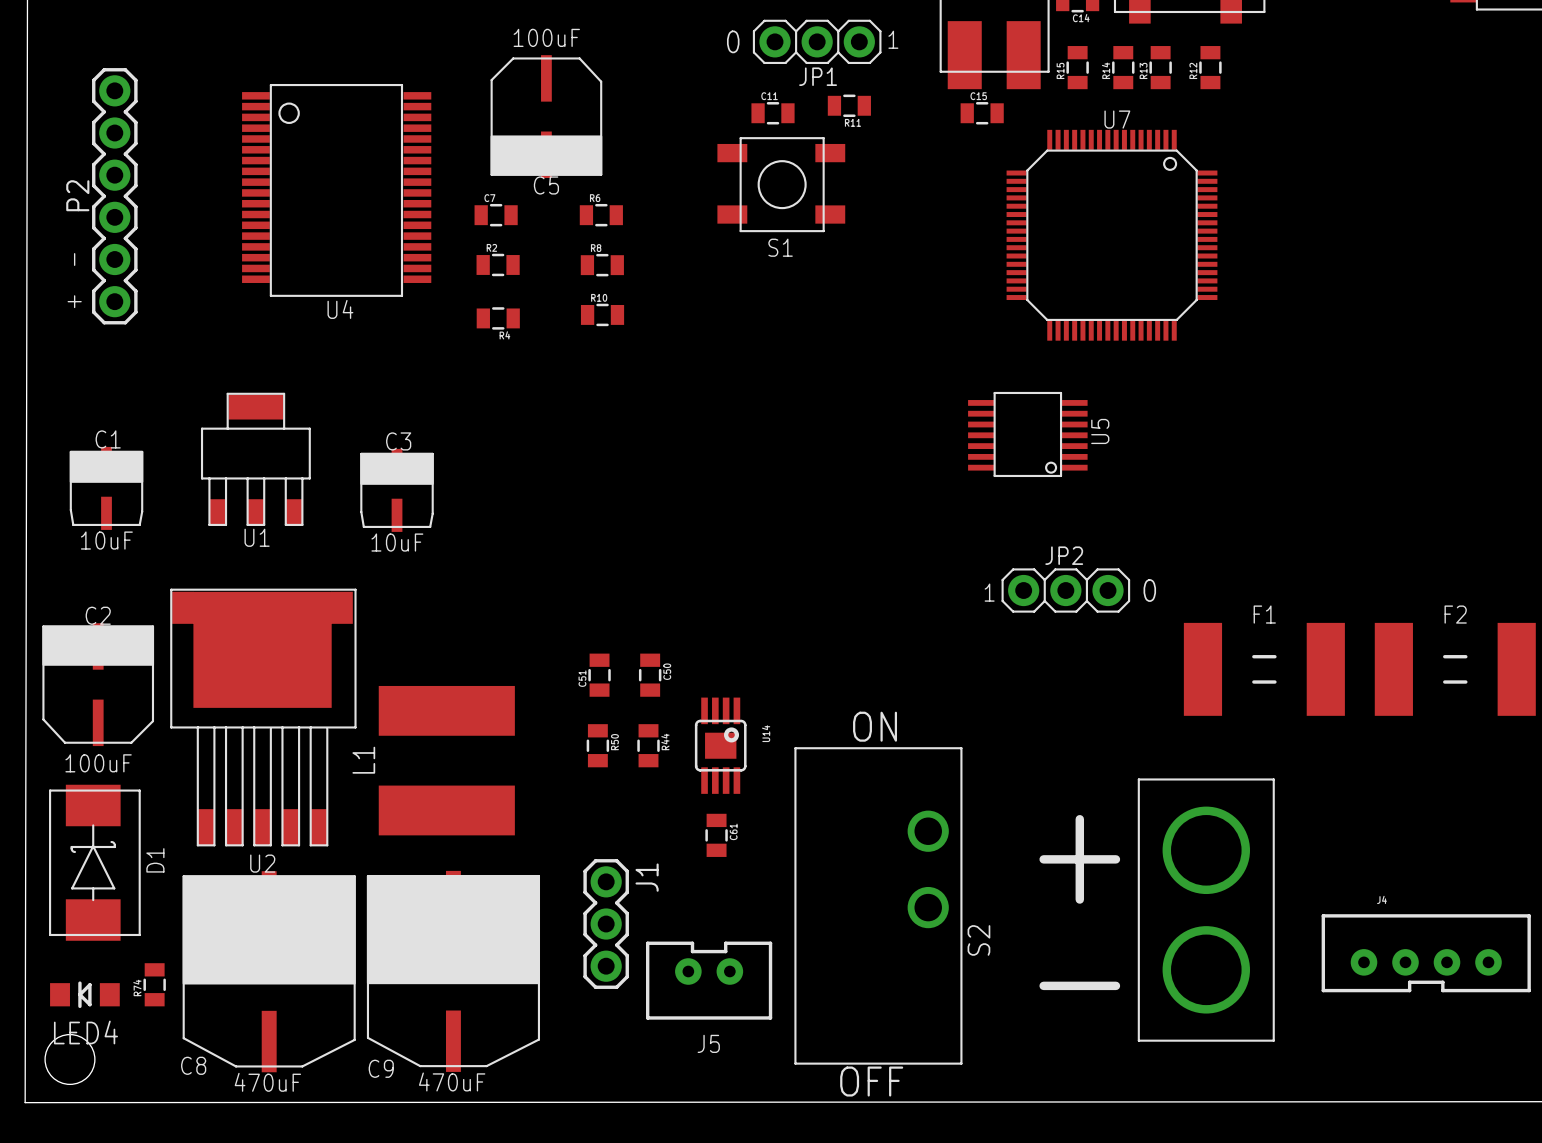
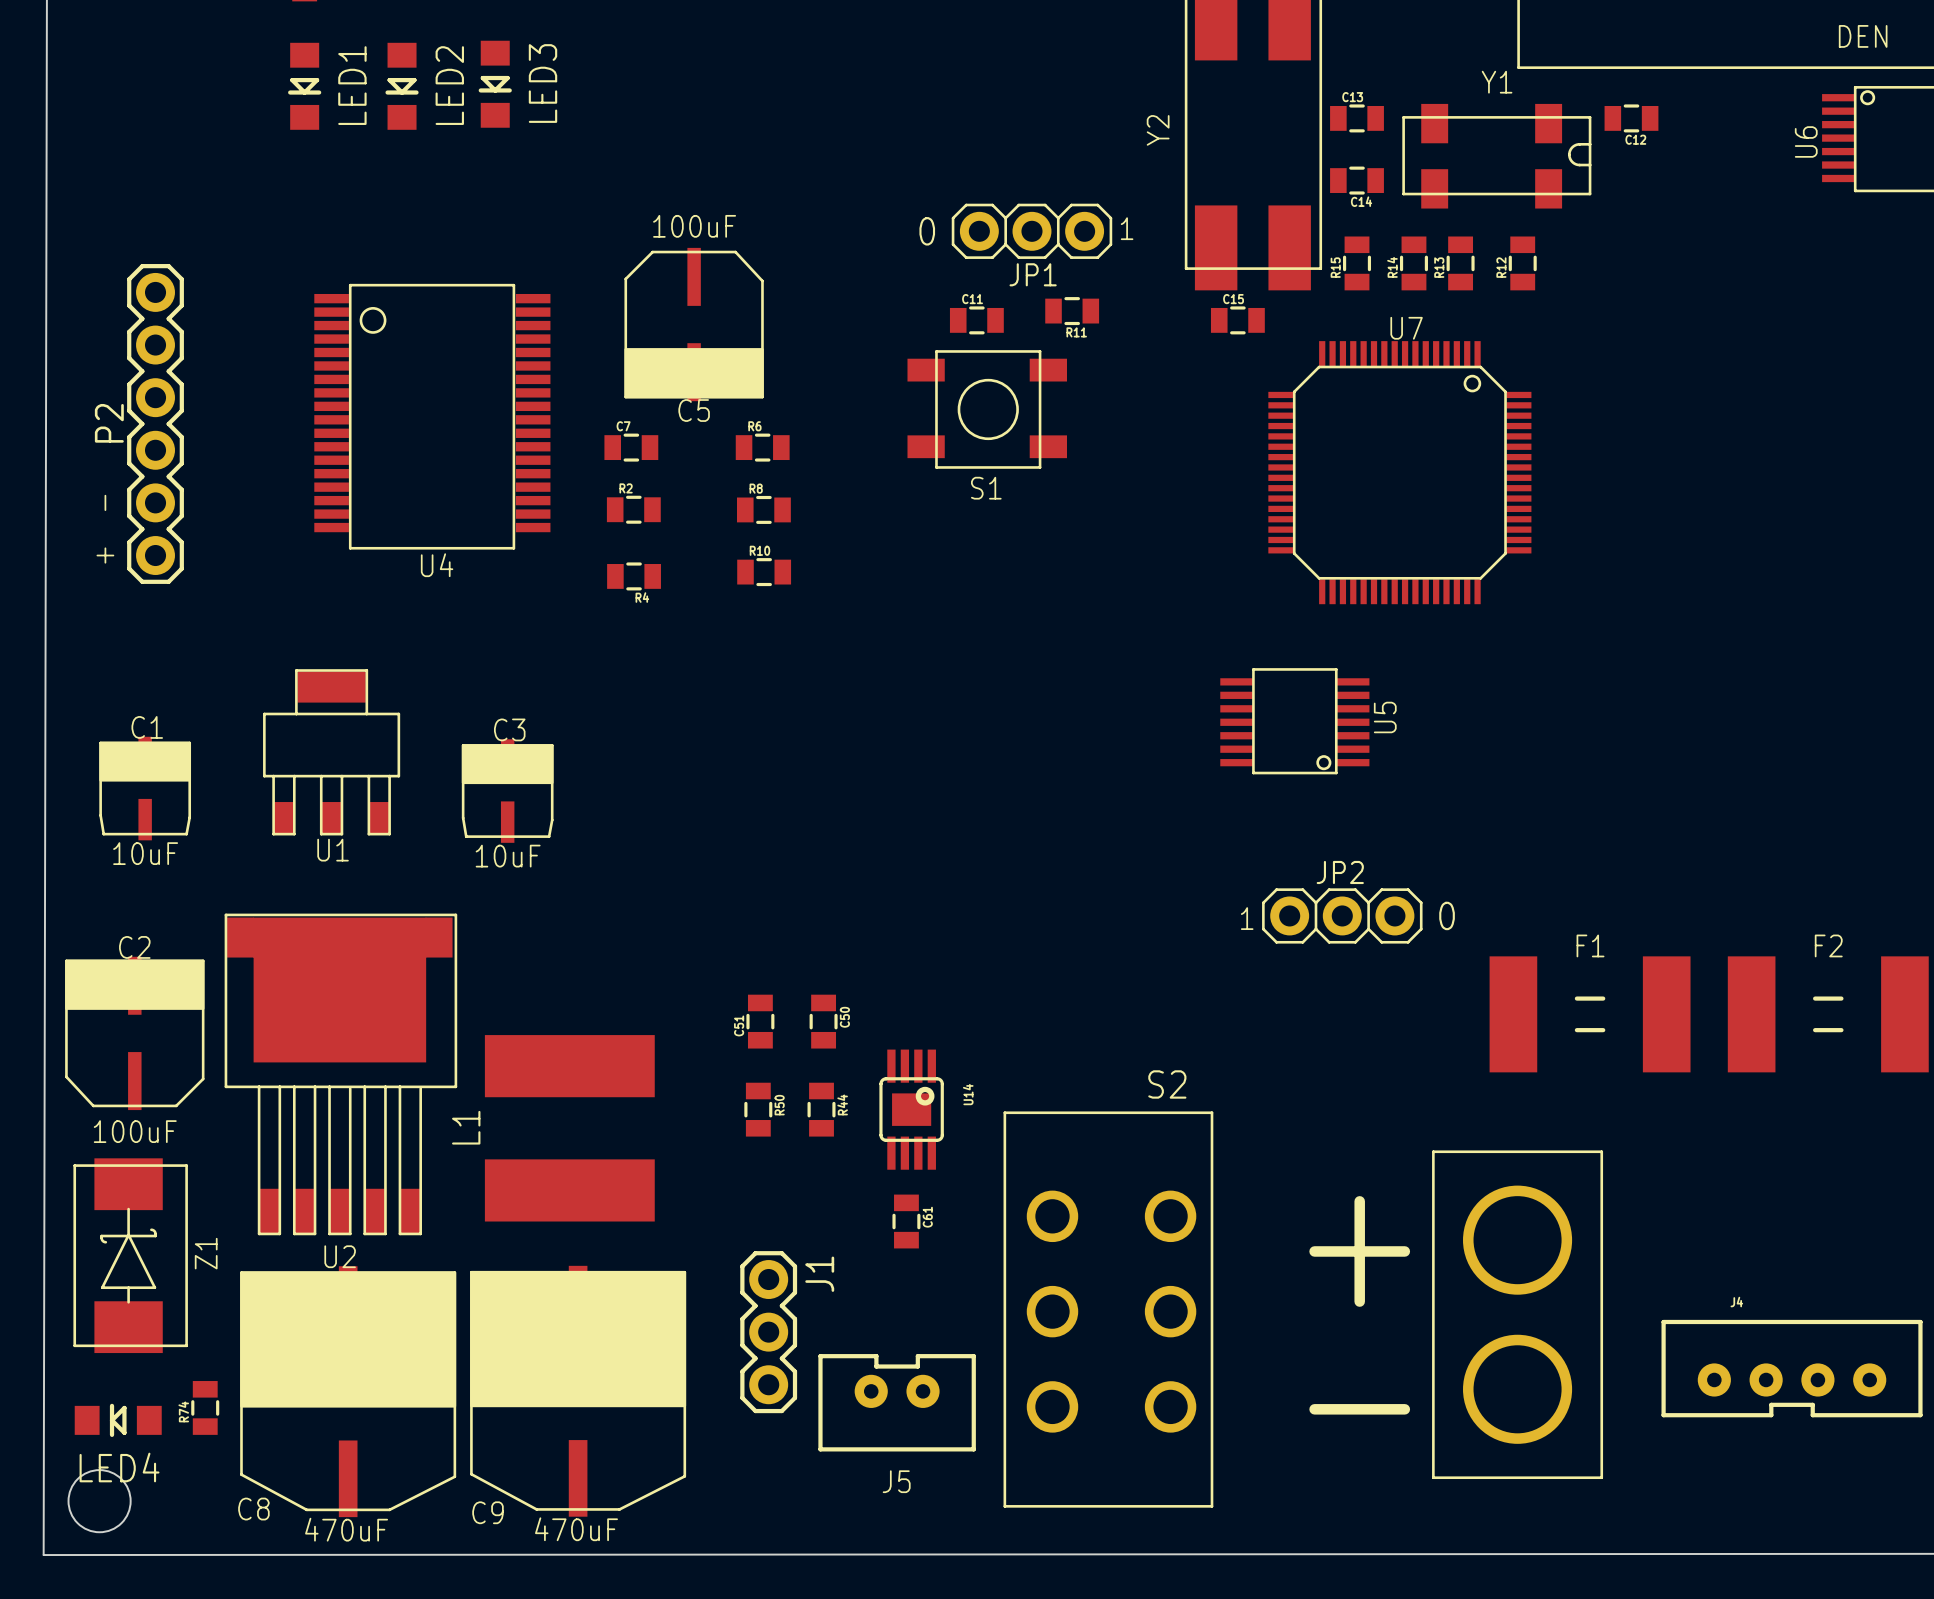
S2 footprint: [794, 747, 963, 1065] -> [1003, 1111, 1214, 1508]
D1 name: D1 (155, 860) -> Z1 (206, 1253)
S2 name position: S2 (978, 940) -> S2 (1167, 1084)

